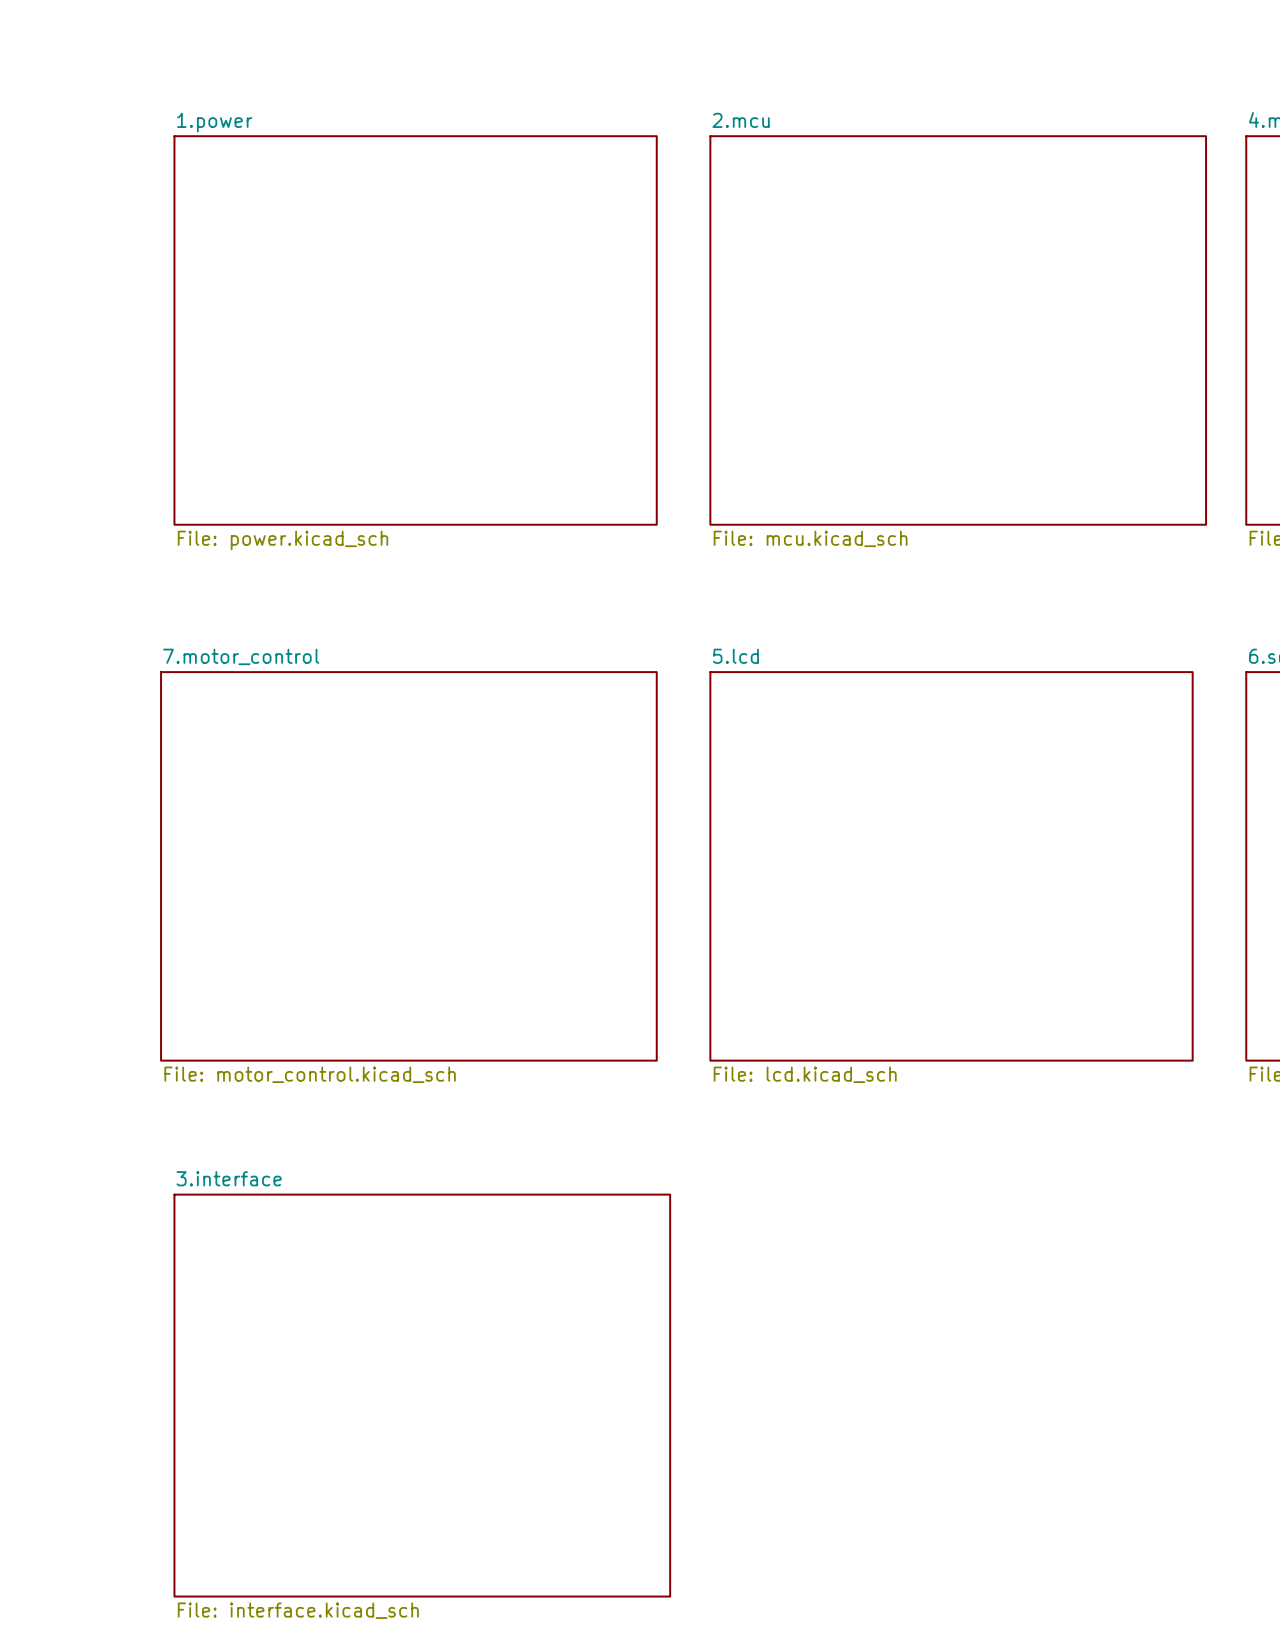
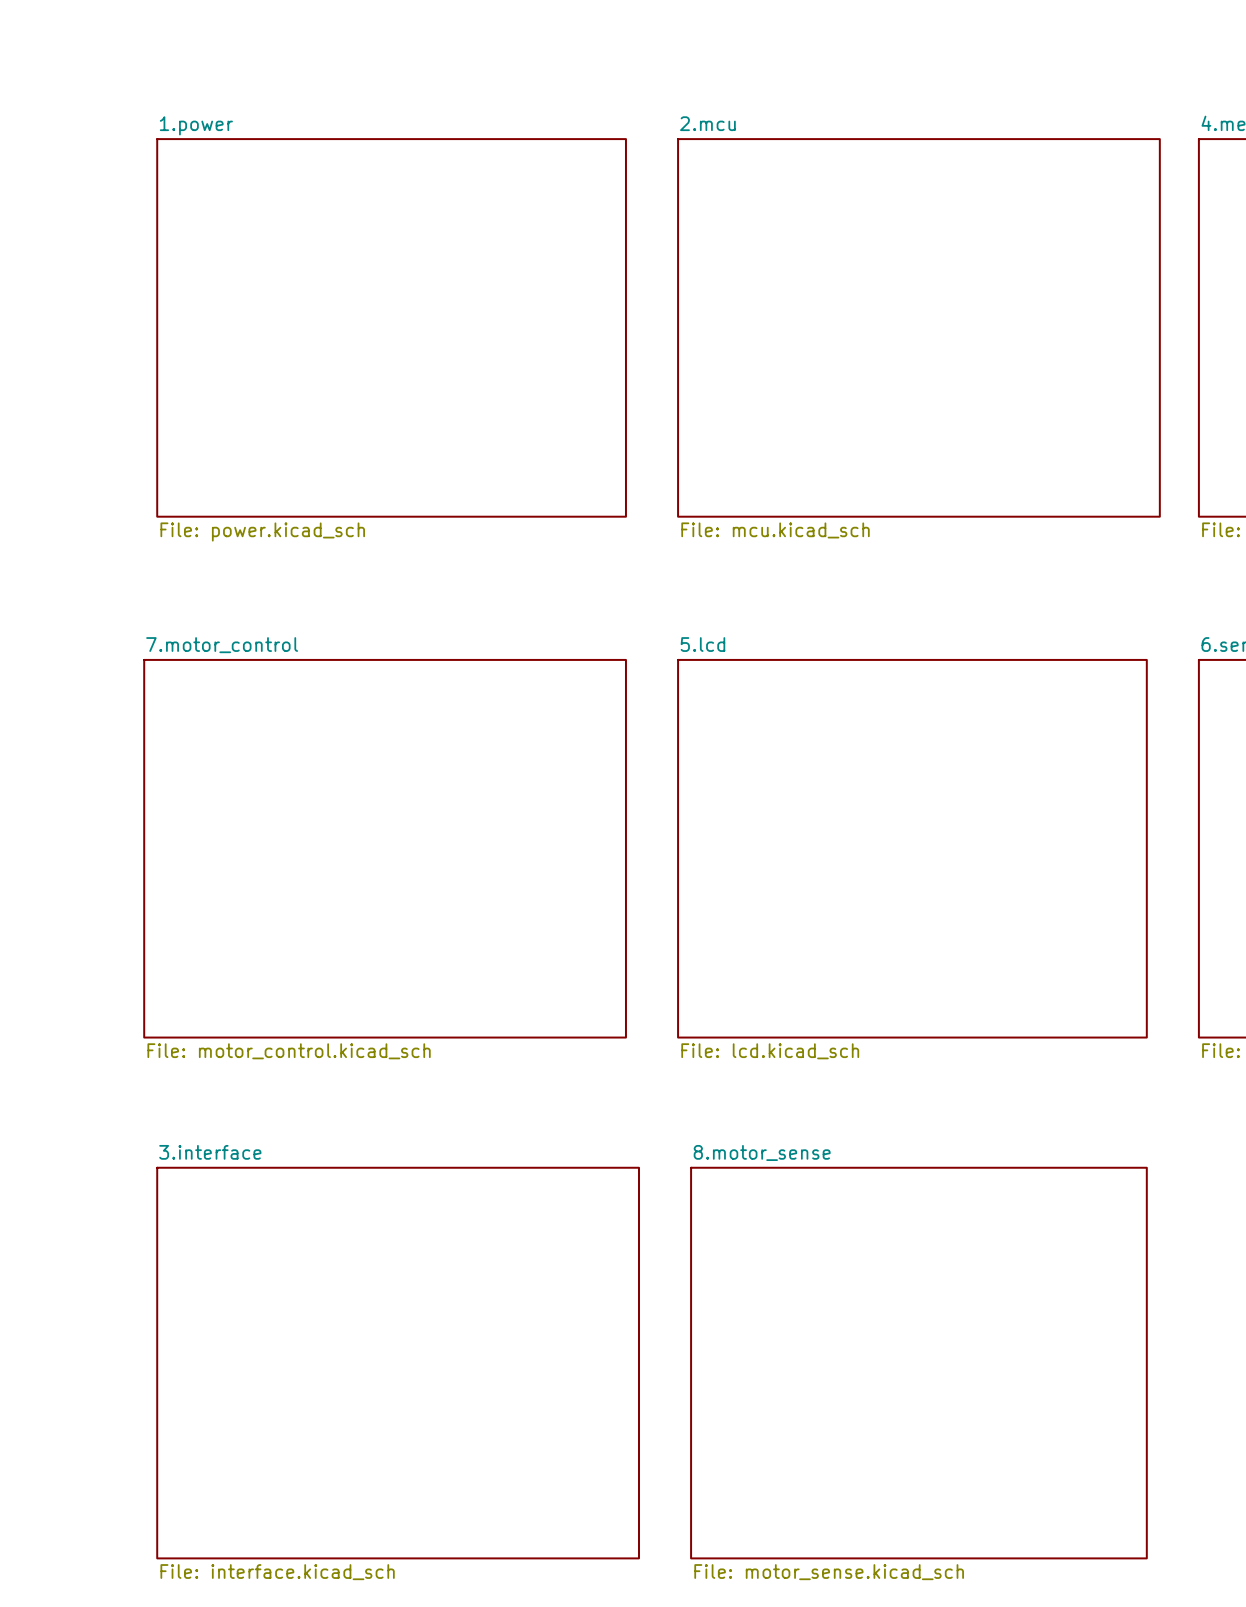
sheet 8.motor_sense: none -> File: motor_sense.kicad_sch (918, 1363)

